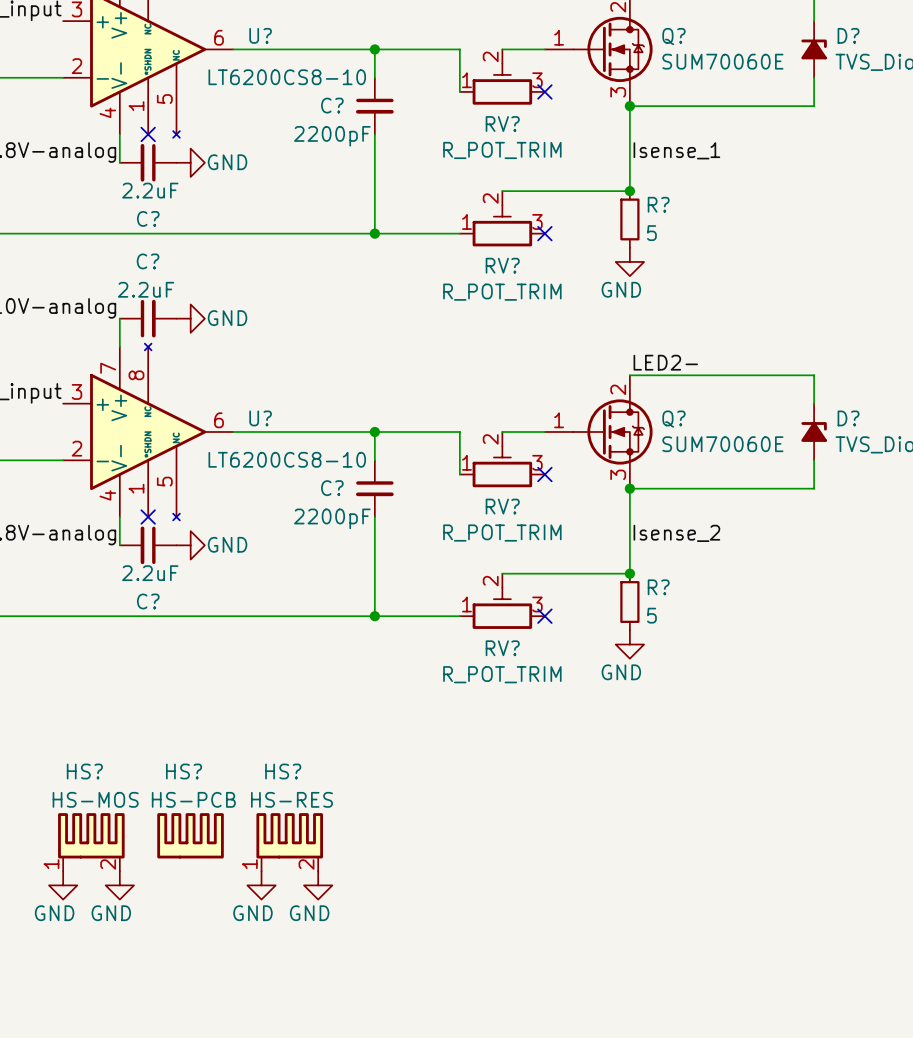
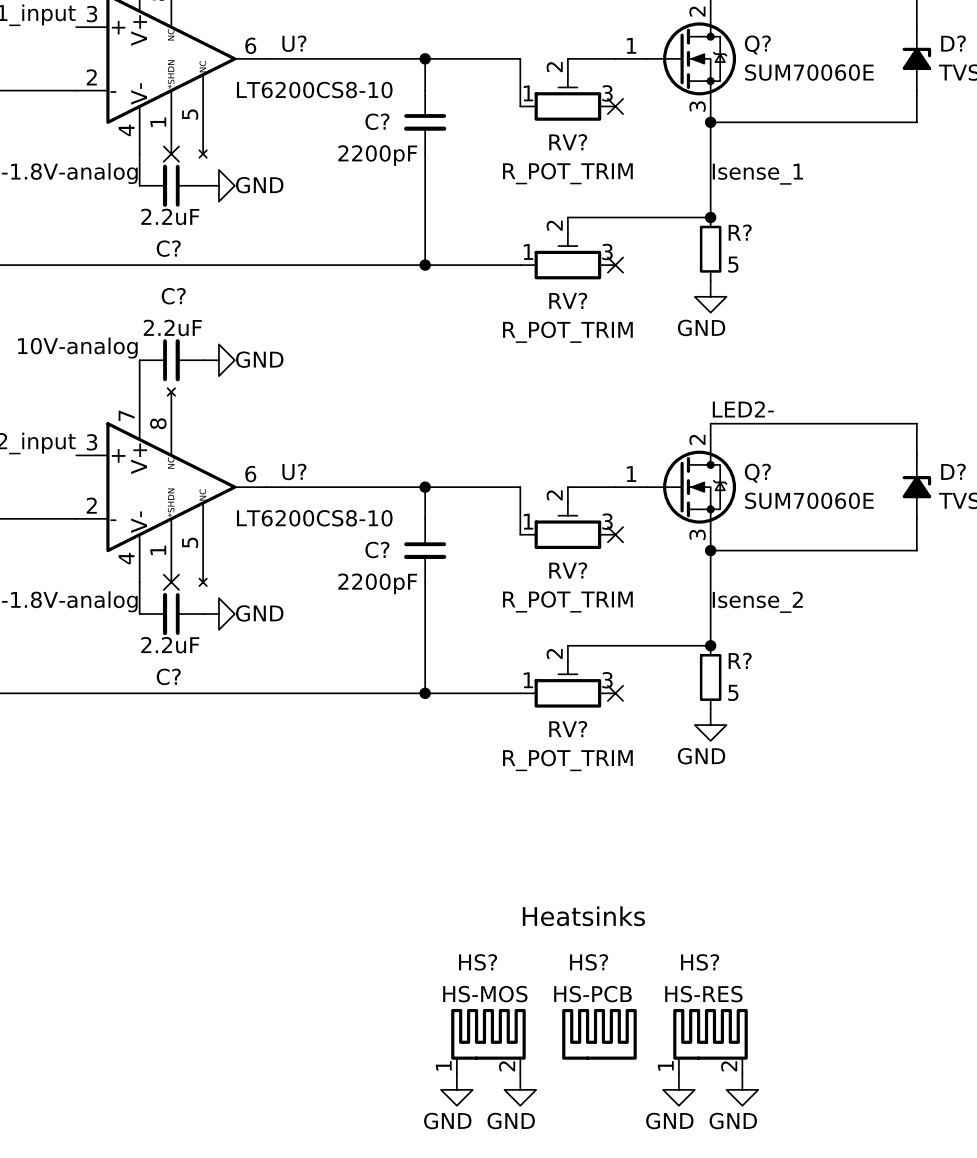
text: none -> Heatsinks (583, 916)
HS?: HS-PCB (190, 835) -> none
HS?: HS-MOS (91, 842) -> none
HS?: HS-RES (289, 842) -> none
power symbol: GND (63, 885) -> none
power symbol: GND (119, 885) -> none
power symbol: GND (261, 885) -> none
power symbol: GND (318, 885) -> none
HS?: none -> HS-PCB (599, 1034)
HS?: none -> HS-MOS (488, 1041)
HS?: none -> HS-RES (710, 1041)
power symbol: none -> GND (456, 1089)
power symbol: none -> GND (520, 1089)
power symbol: none -> GND (678, 1089)
power symbol: none -> GND (742, 1089)

